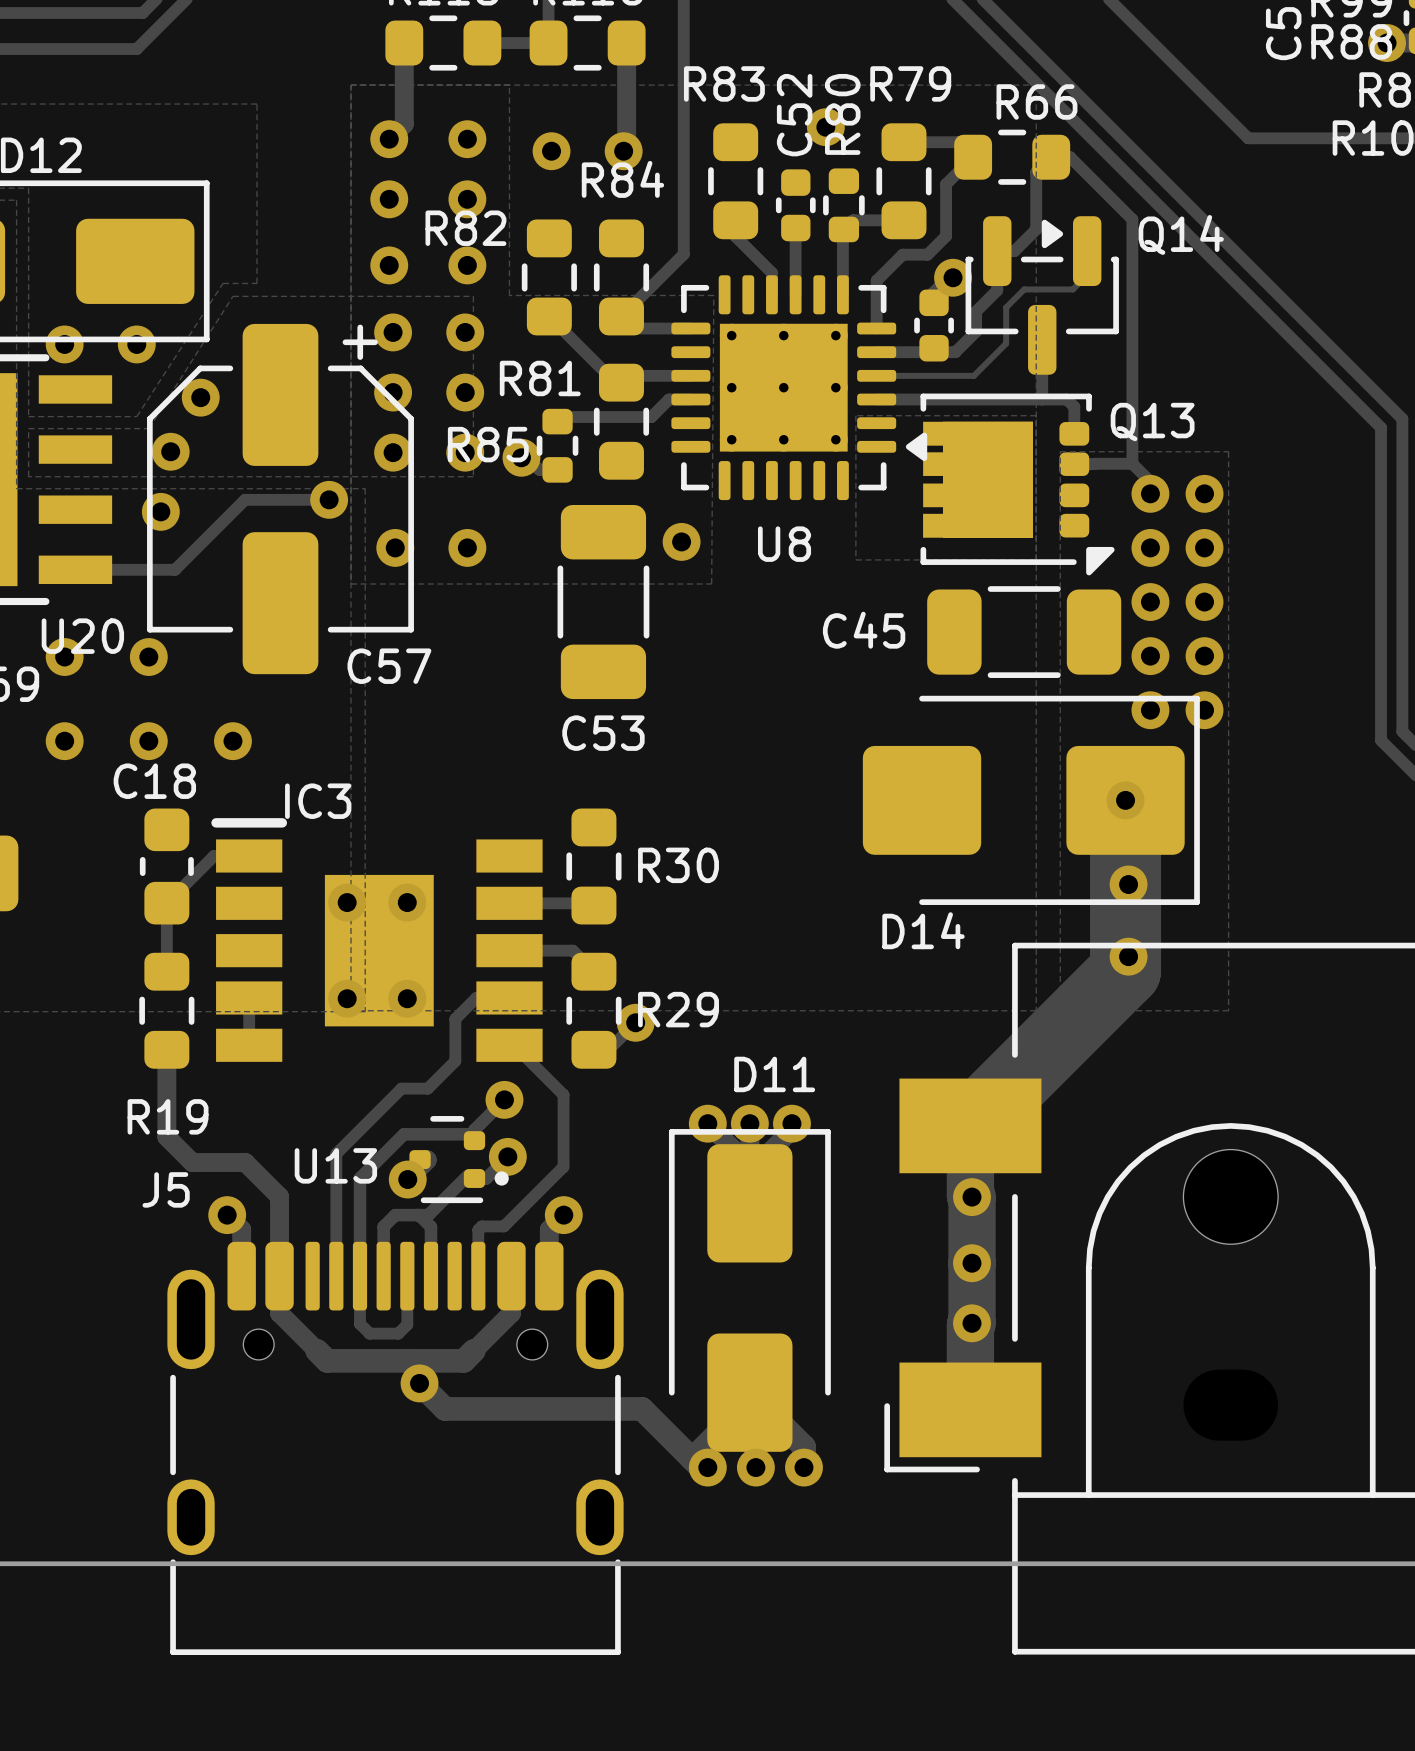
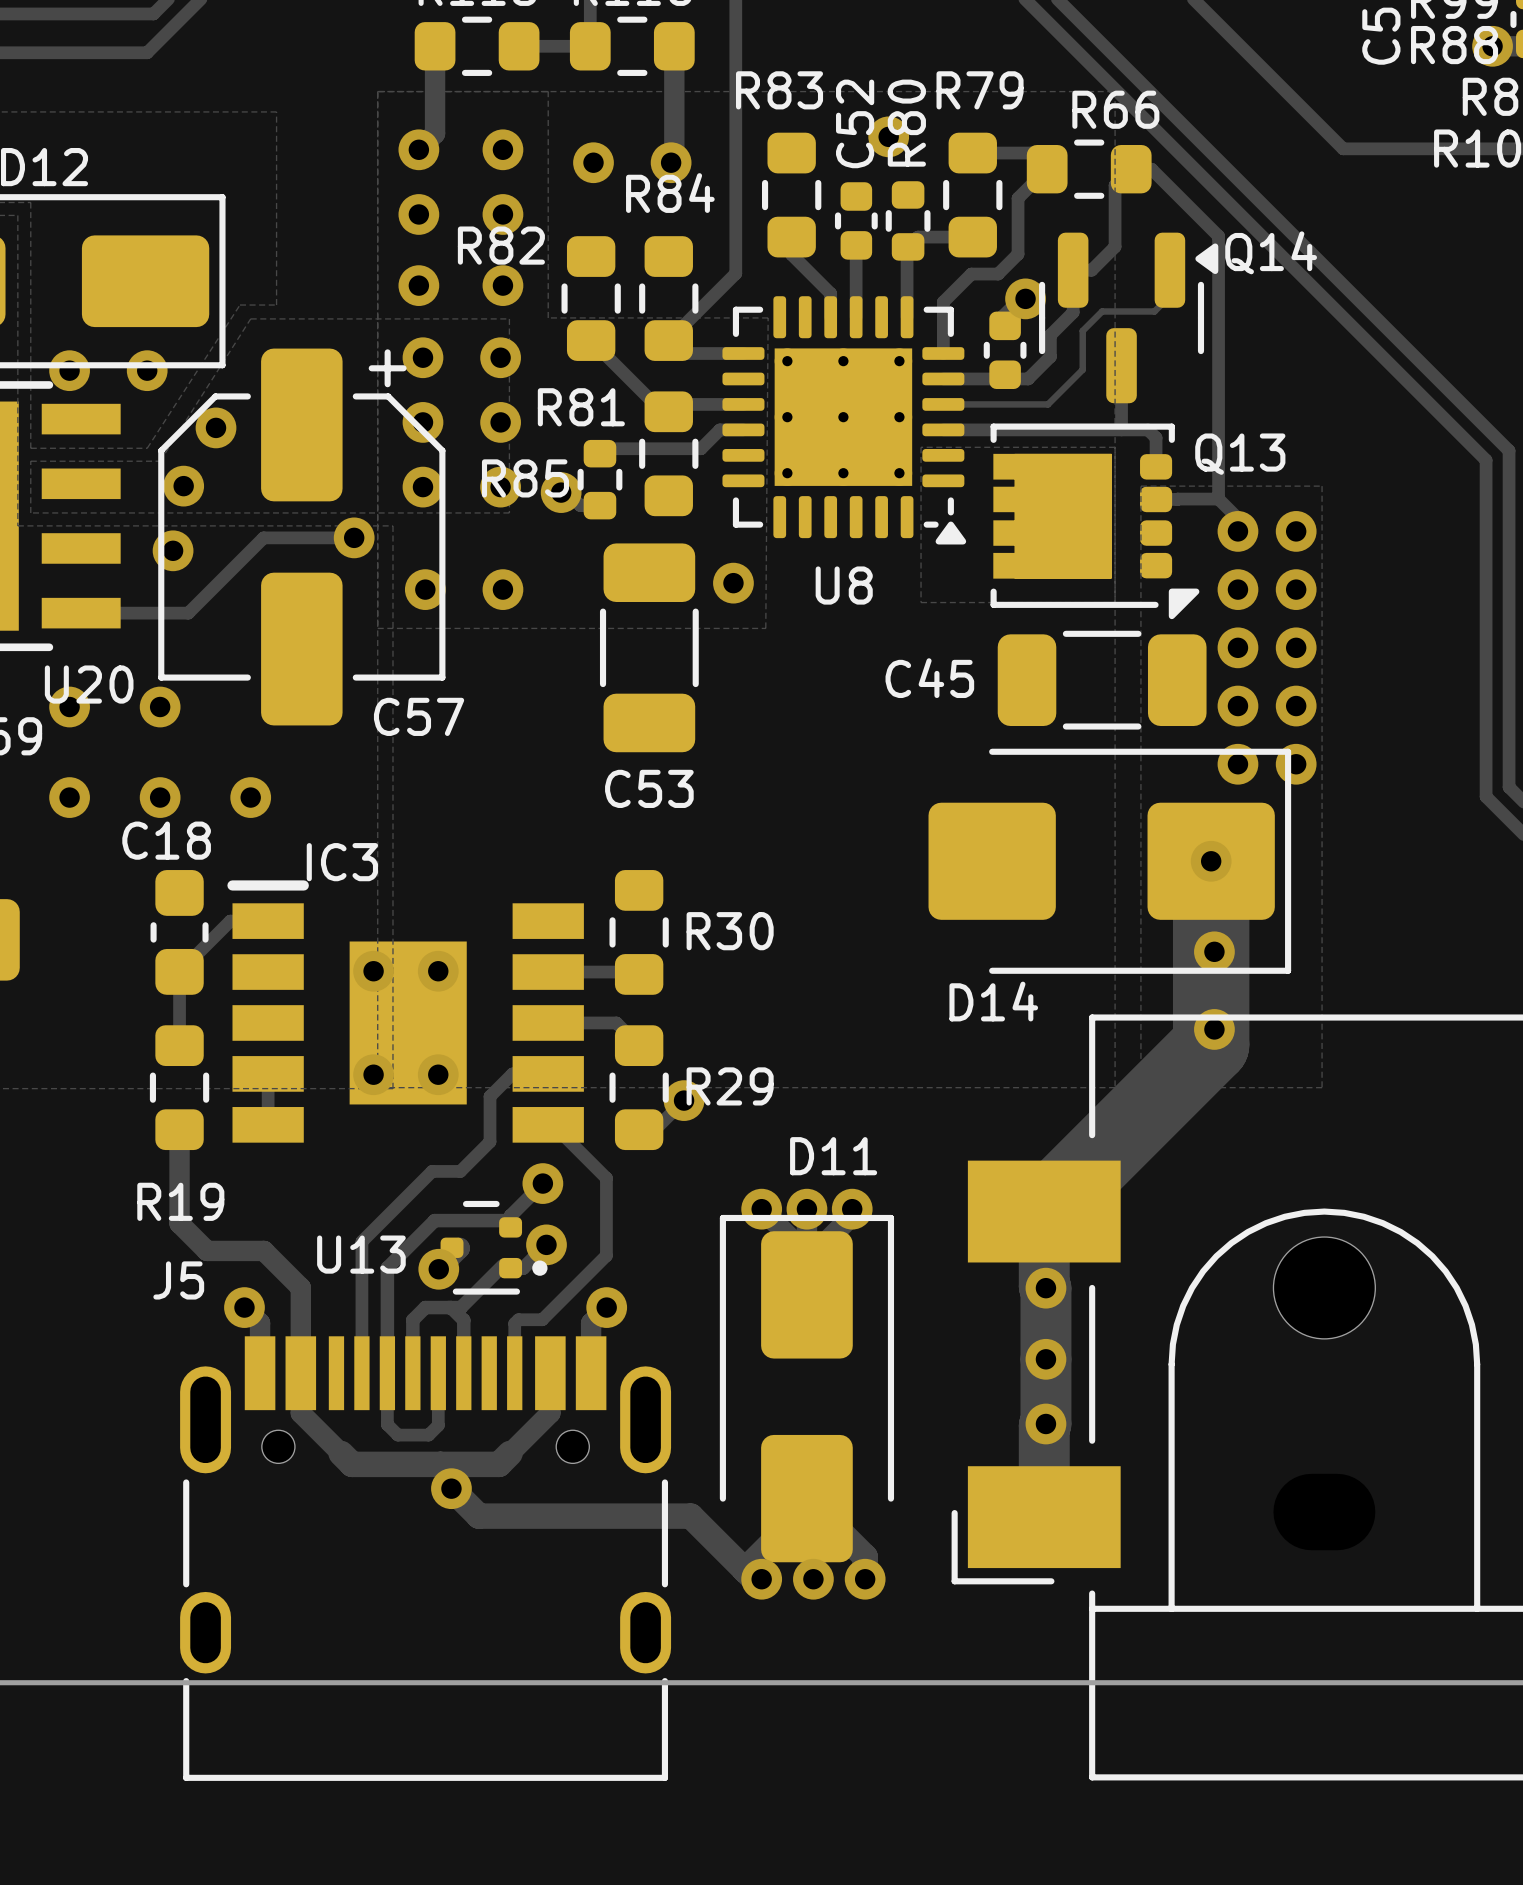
Q14 footprint: [965, 216, 1119, 375] -> [1039, 232, 1219, 404]
U8 footprint: [671, 275, 928, 501] -> [722, 296, 967, 545]
J5 footprint: [167, 1241, 624, 1656] -> [180, 1336, 672, 1781]

